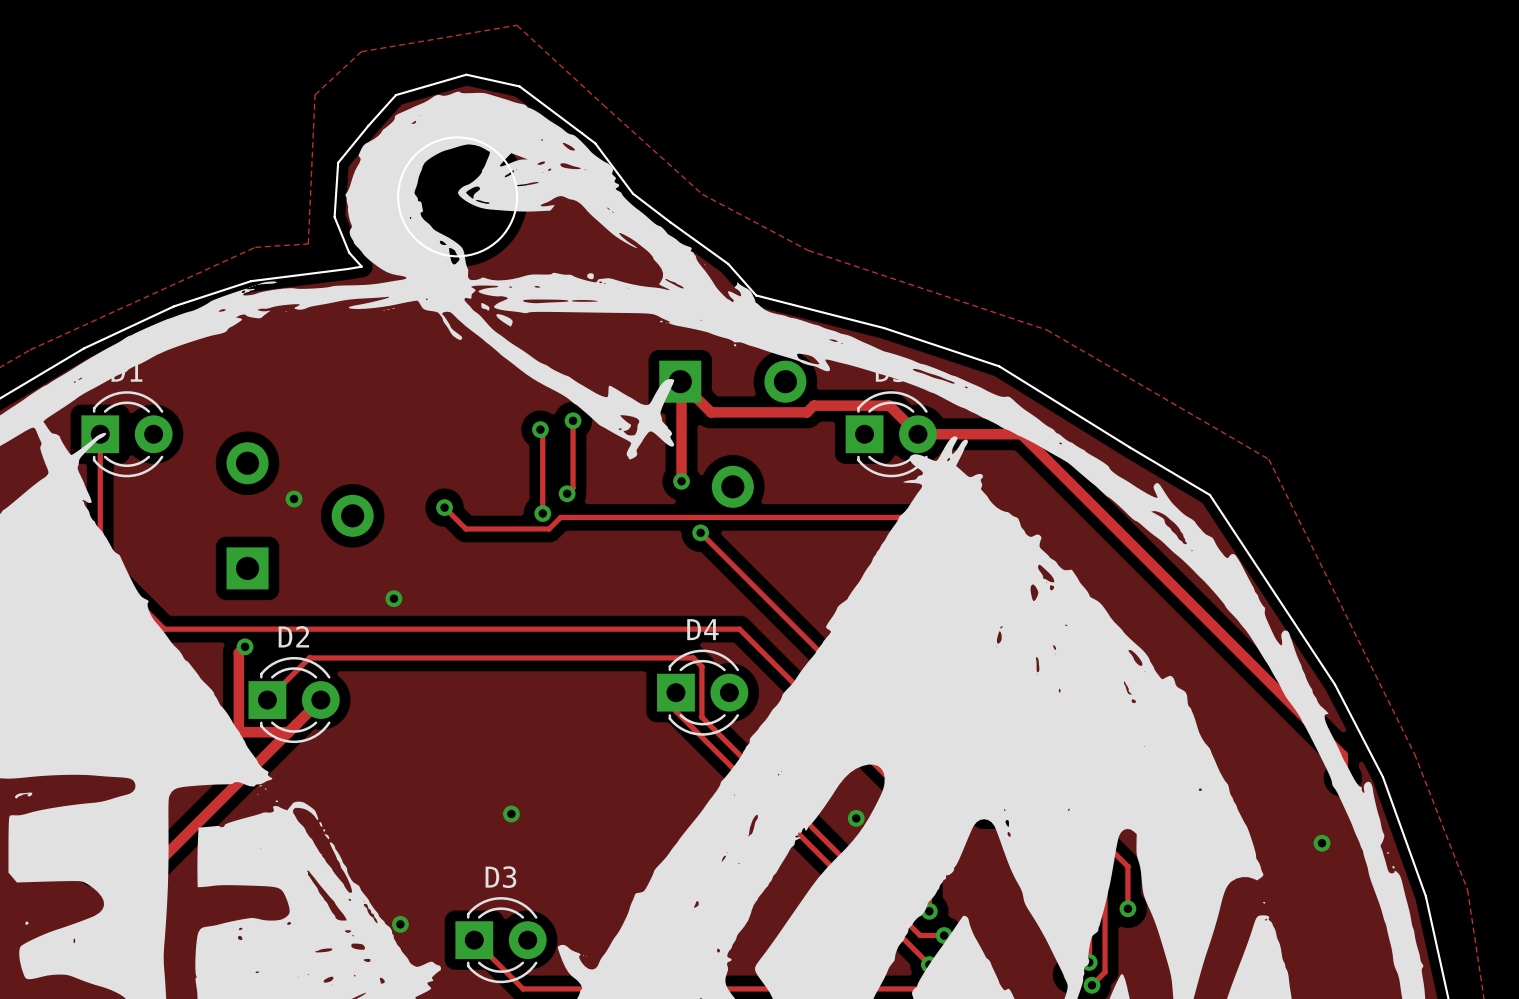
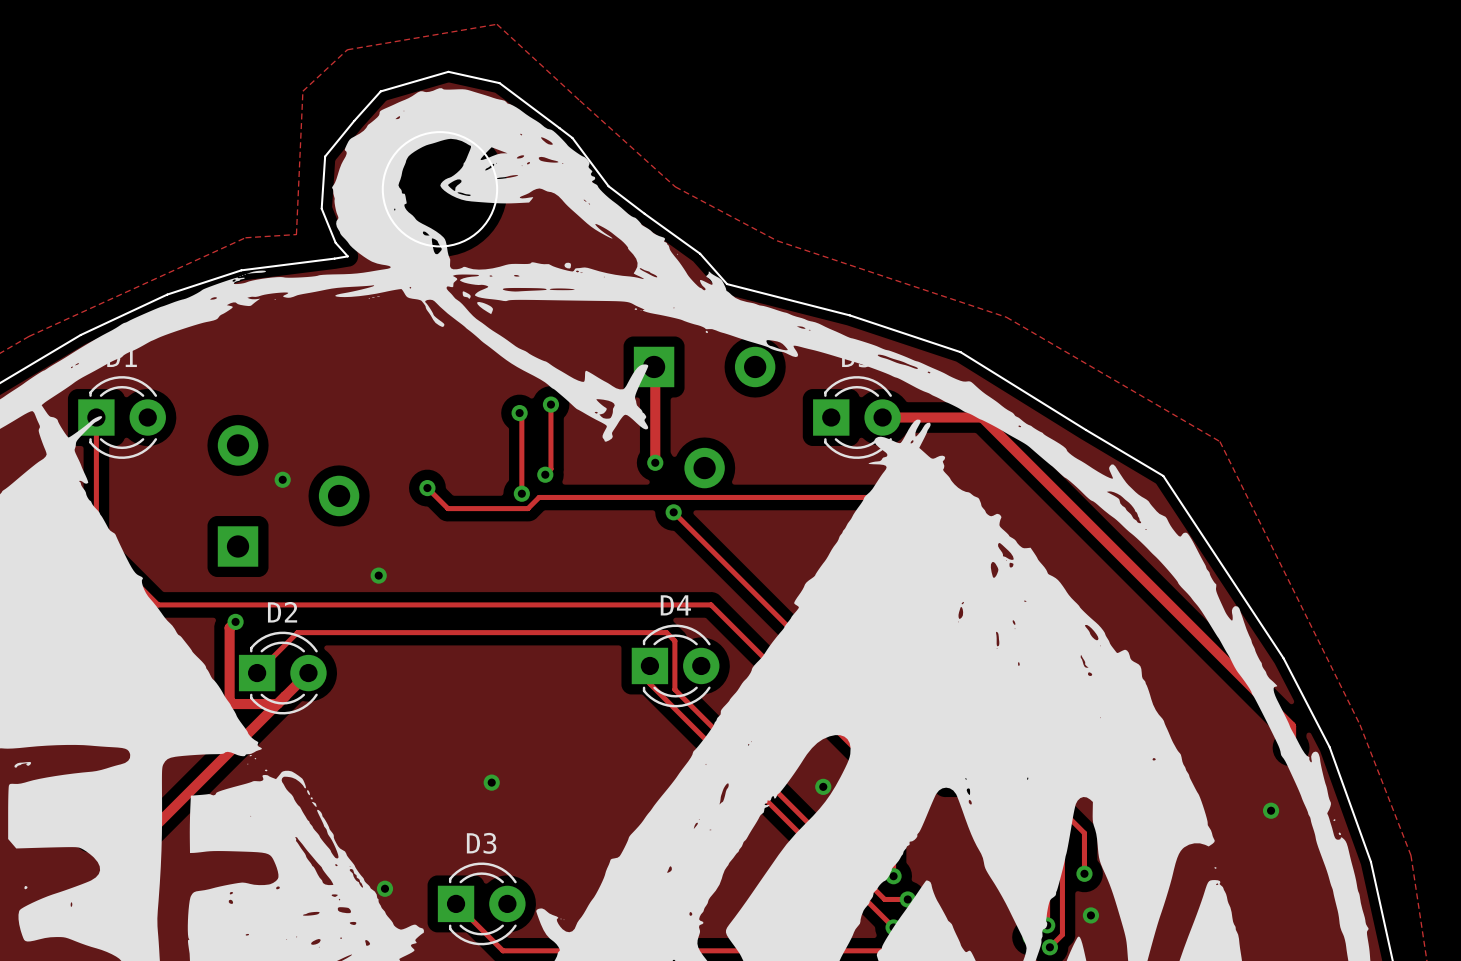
track: (681, 382) (710, 412) (807, 412) (813, 405) (889, 405) (917, 434) -> none
via: none -> (1090, 915)

